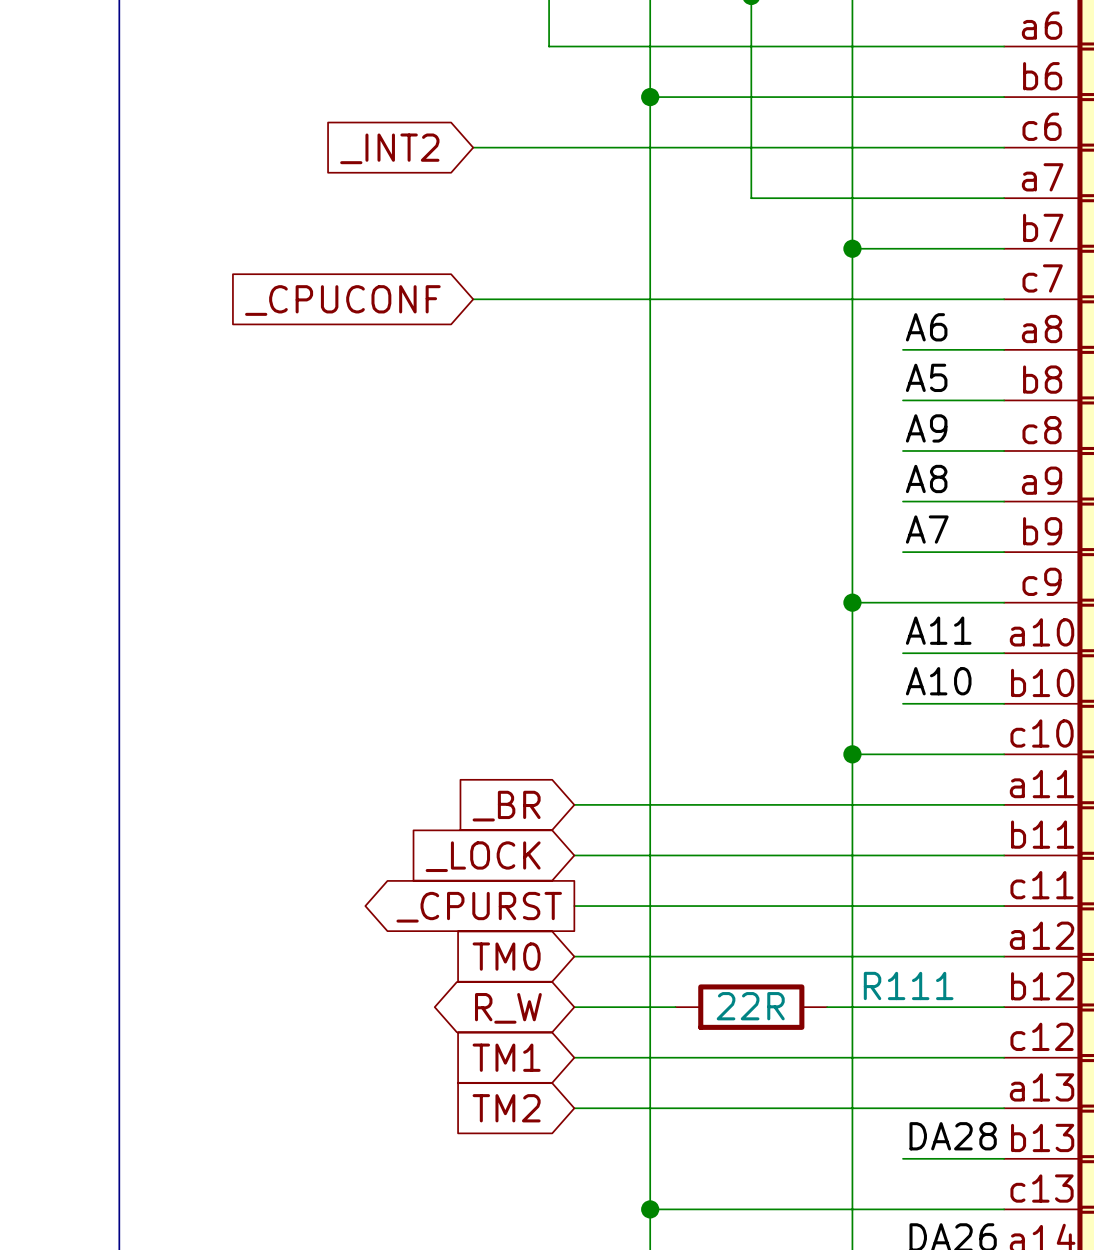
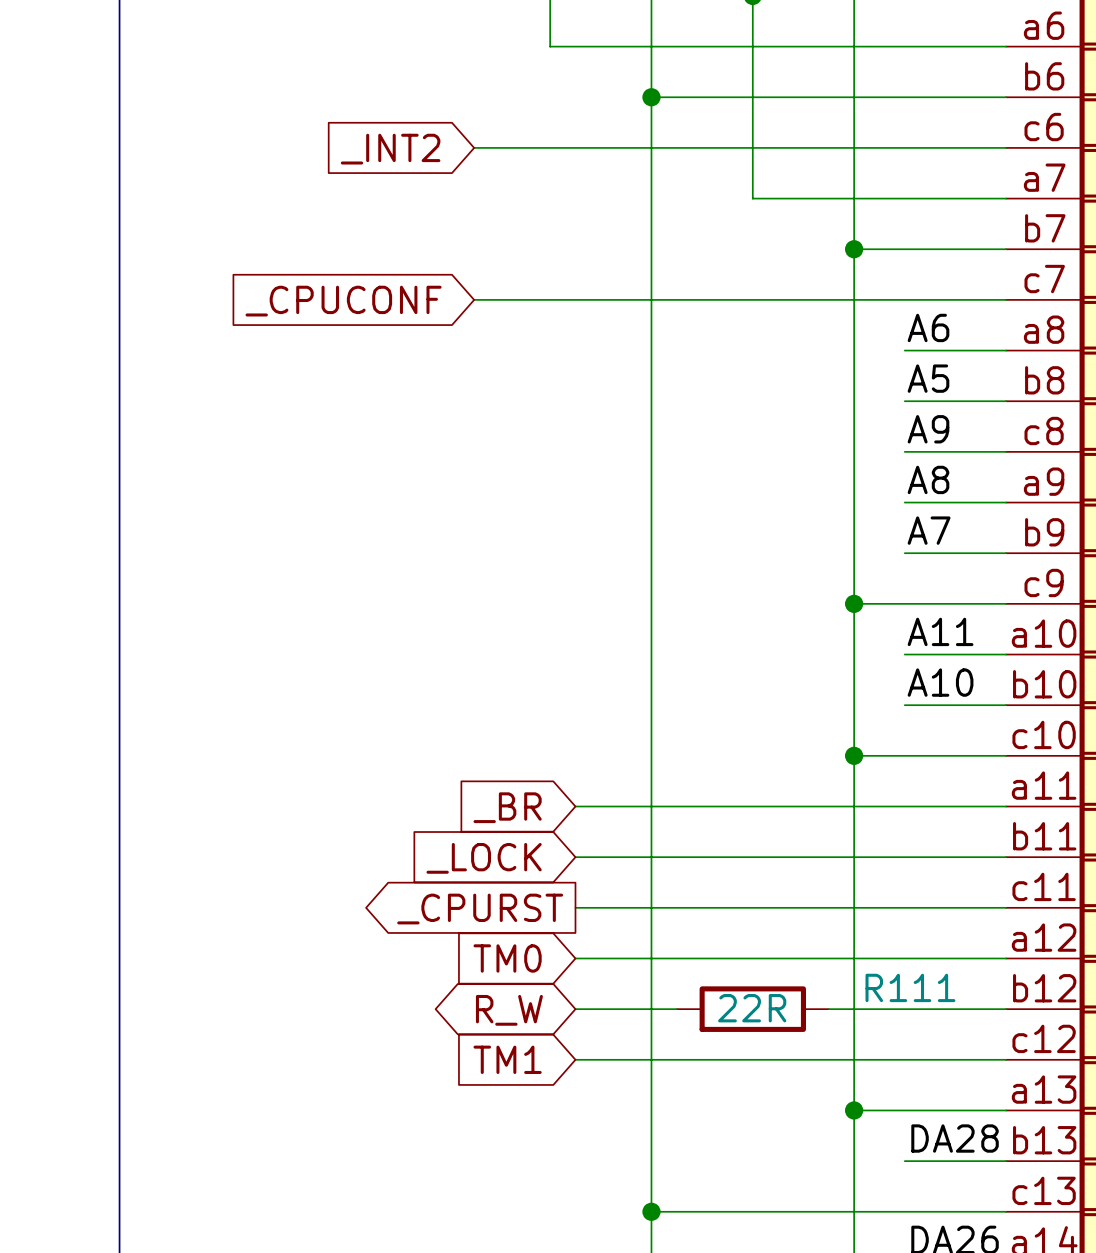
global label: TM2 (506, 1108) -> none
wire: (574, 1108) (852, 1108) -> none
junction: none -> (854, 1110)

